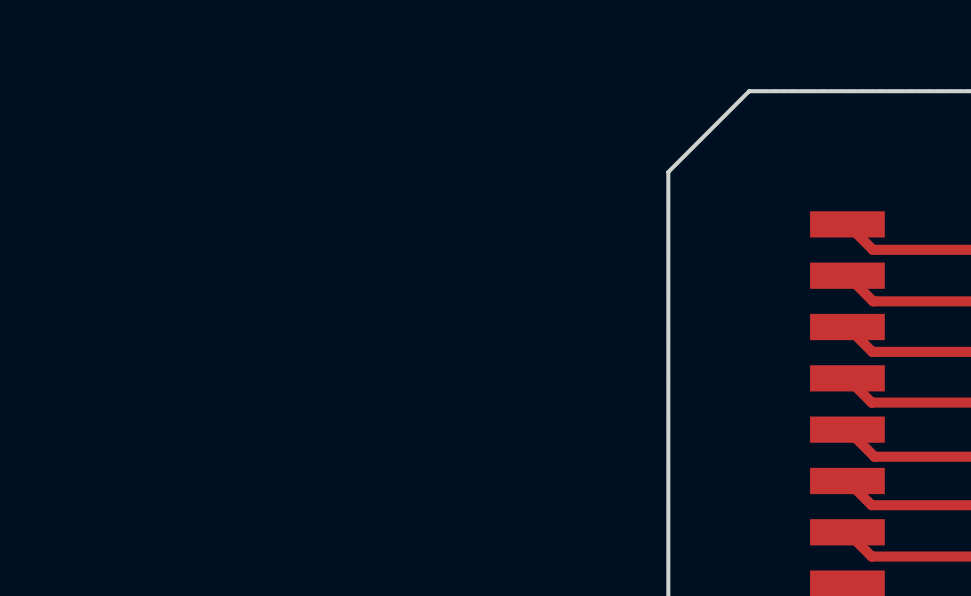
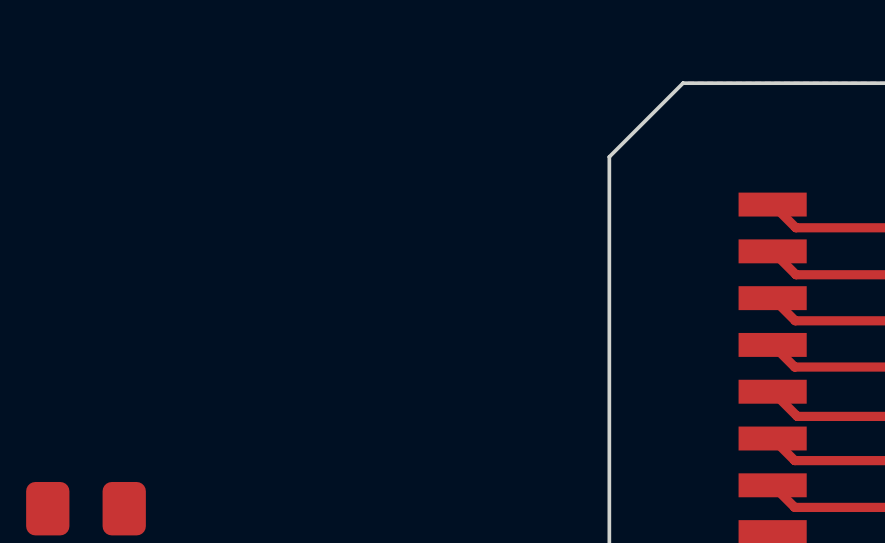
part: none -> (86, 508)

